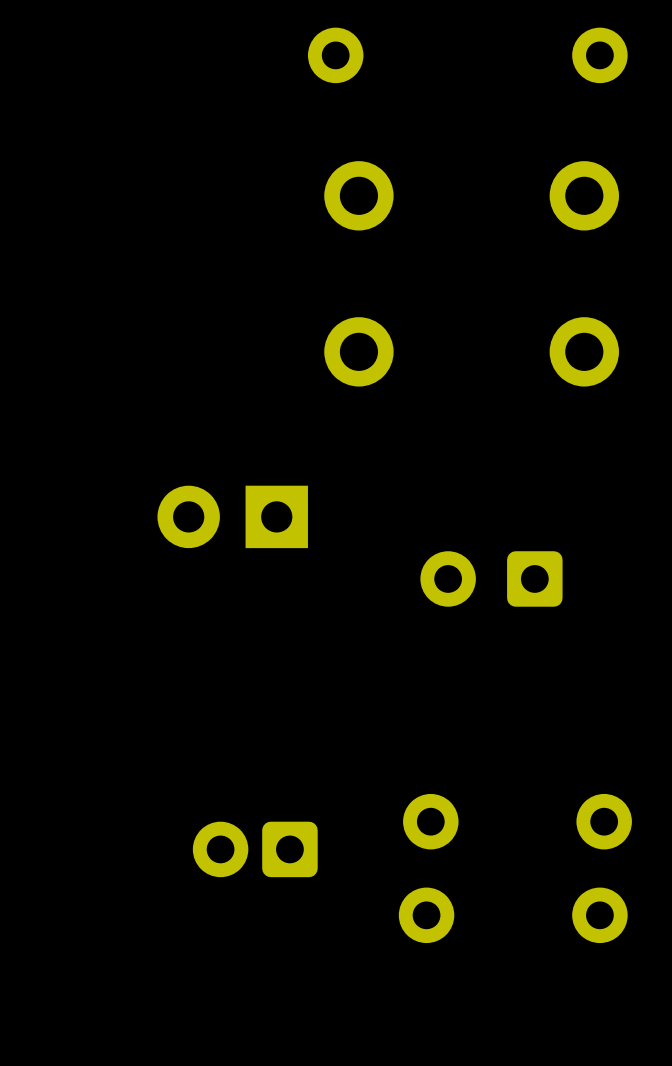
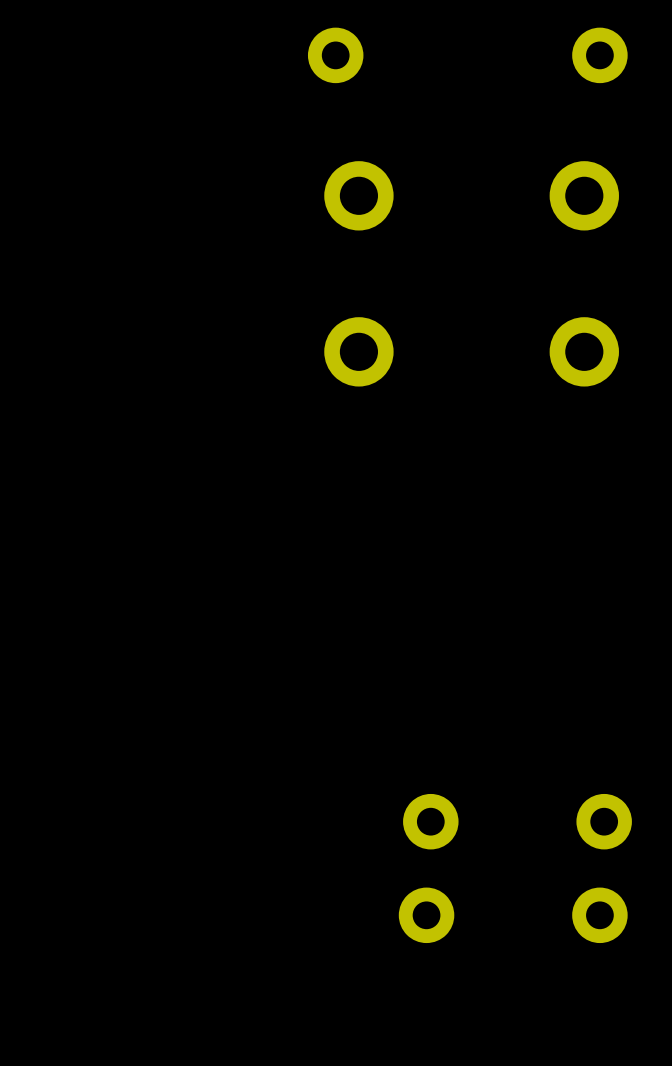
part: (232, 516) -> none
part: (491, 578) -> none
part: (255, 849) -> none

